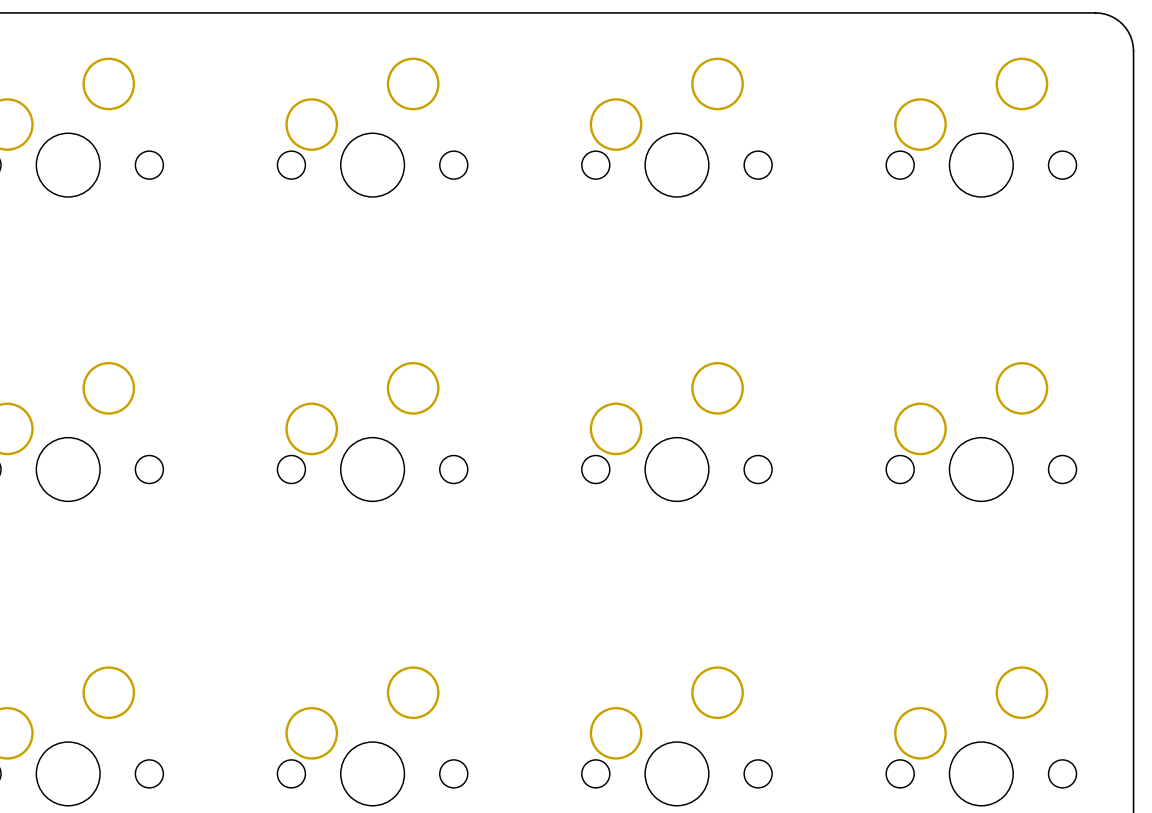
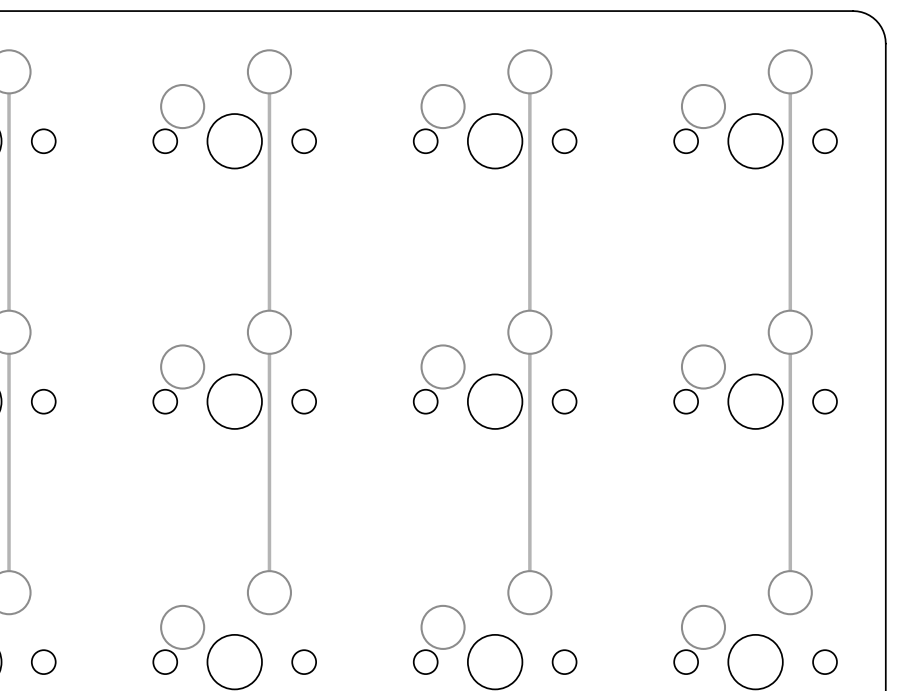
track: none -> (9, 71) (9, 592)
track: none -> (269, 71) (269, 592)
track: none -> (529, 71) (529, 592)
track: none -> (790, 71) (790, 592)

